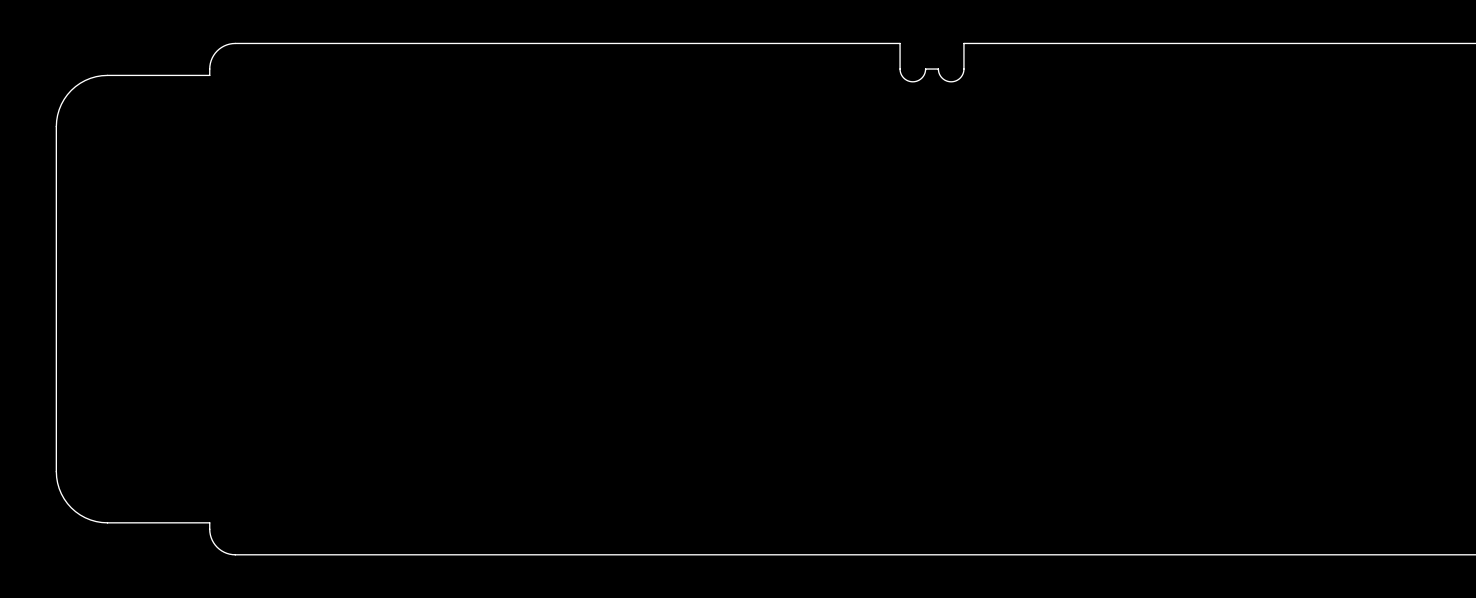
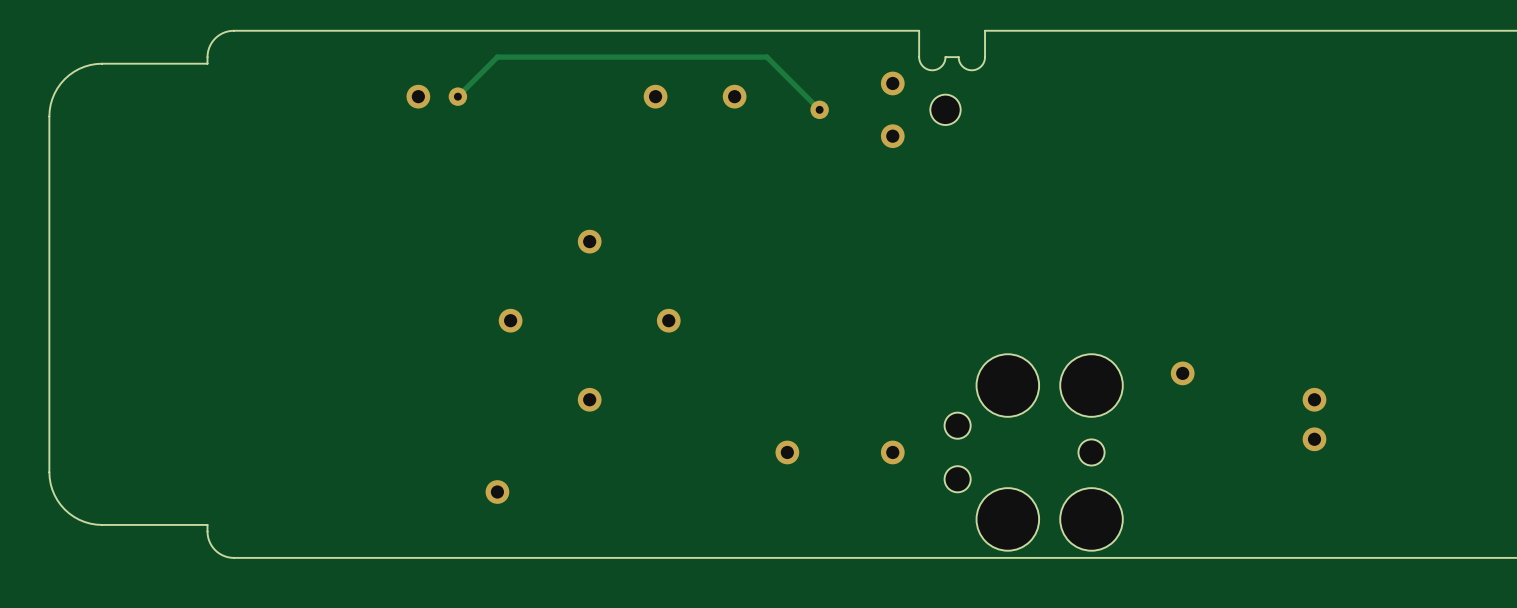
via: none -> (892, 83)
via: none -> (418, 96)
track: none -> (457, 96) (497, 57) (766, 57) (819, 109)
via: none -> (457, 96)
via: none -> (655, 96)
via: none -> (734, 96)
via: none -> (819, 109)
part: none -> (945, 109)
via: none -> (892, 136)
via: none -> (589, 241)
via: none -> (510, 320)
via: none -> (668, 320)
via: none -> (1182, 373)
via: none -> (589, 399)
via: none -> (1314, 399)
via: none -> (1314, 439)
via: none -> (787, 452)
via: none -> (892, 452)
part: none -> (1033, 452)
via: none -> (497, 492)

